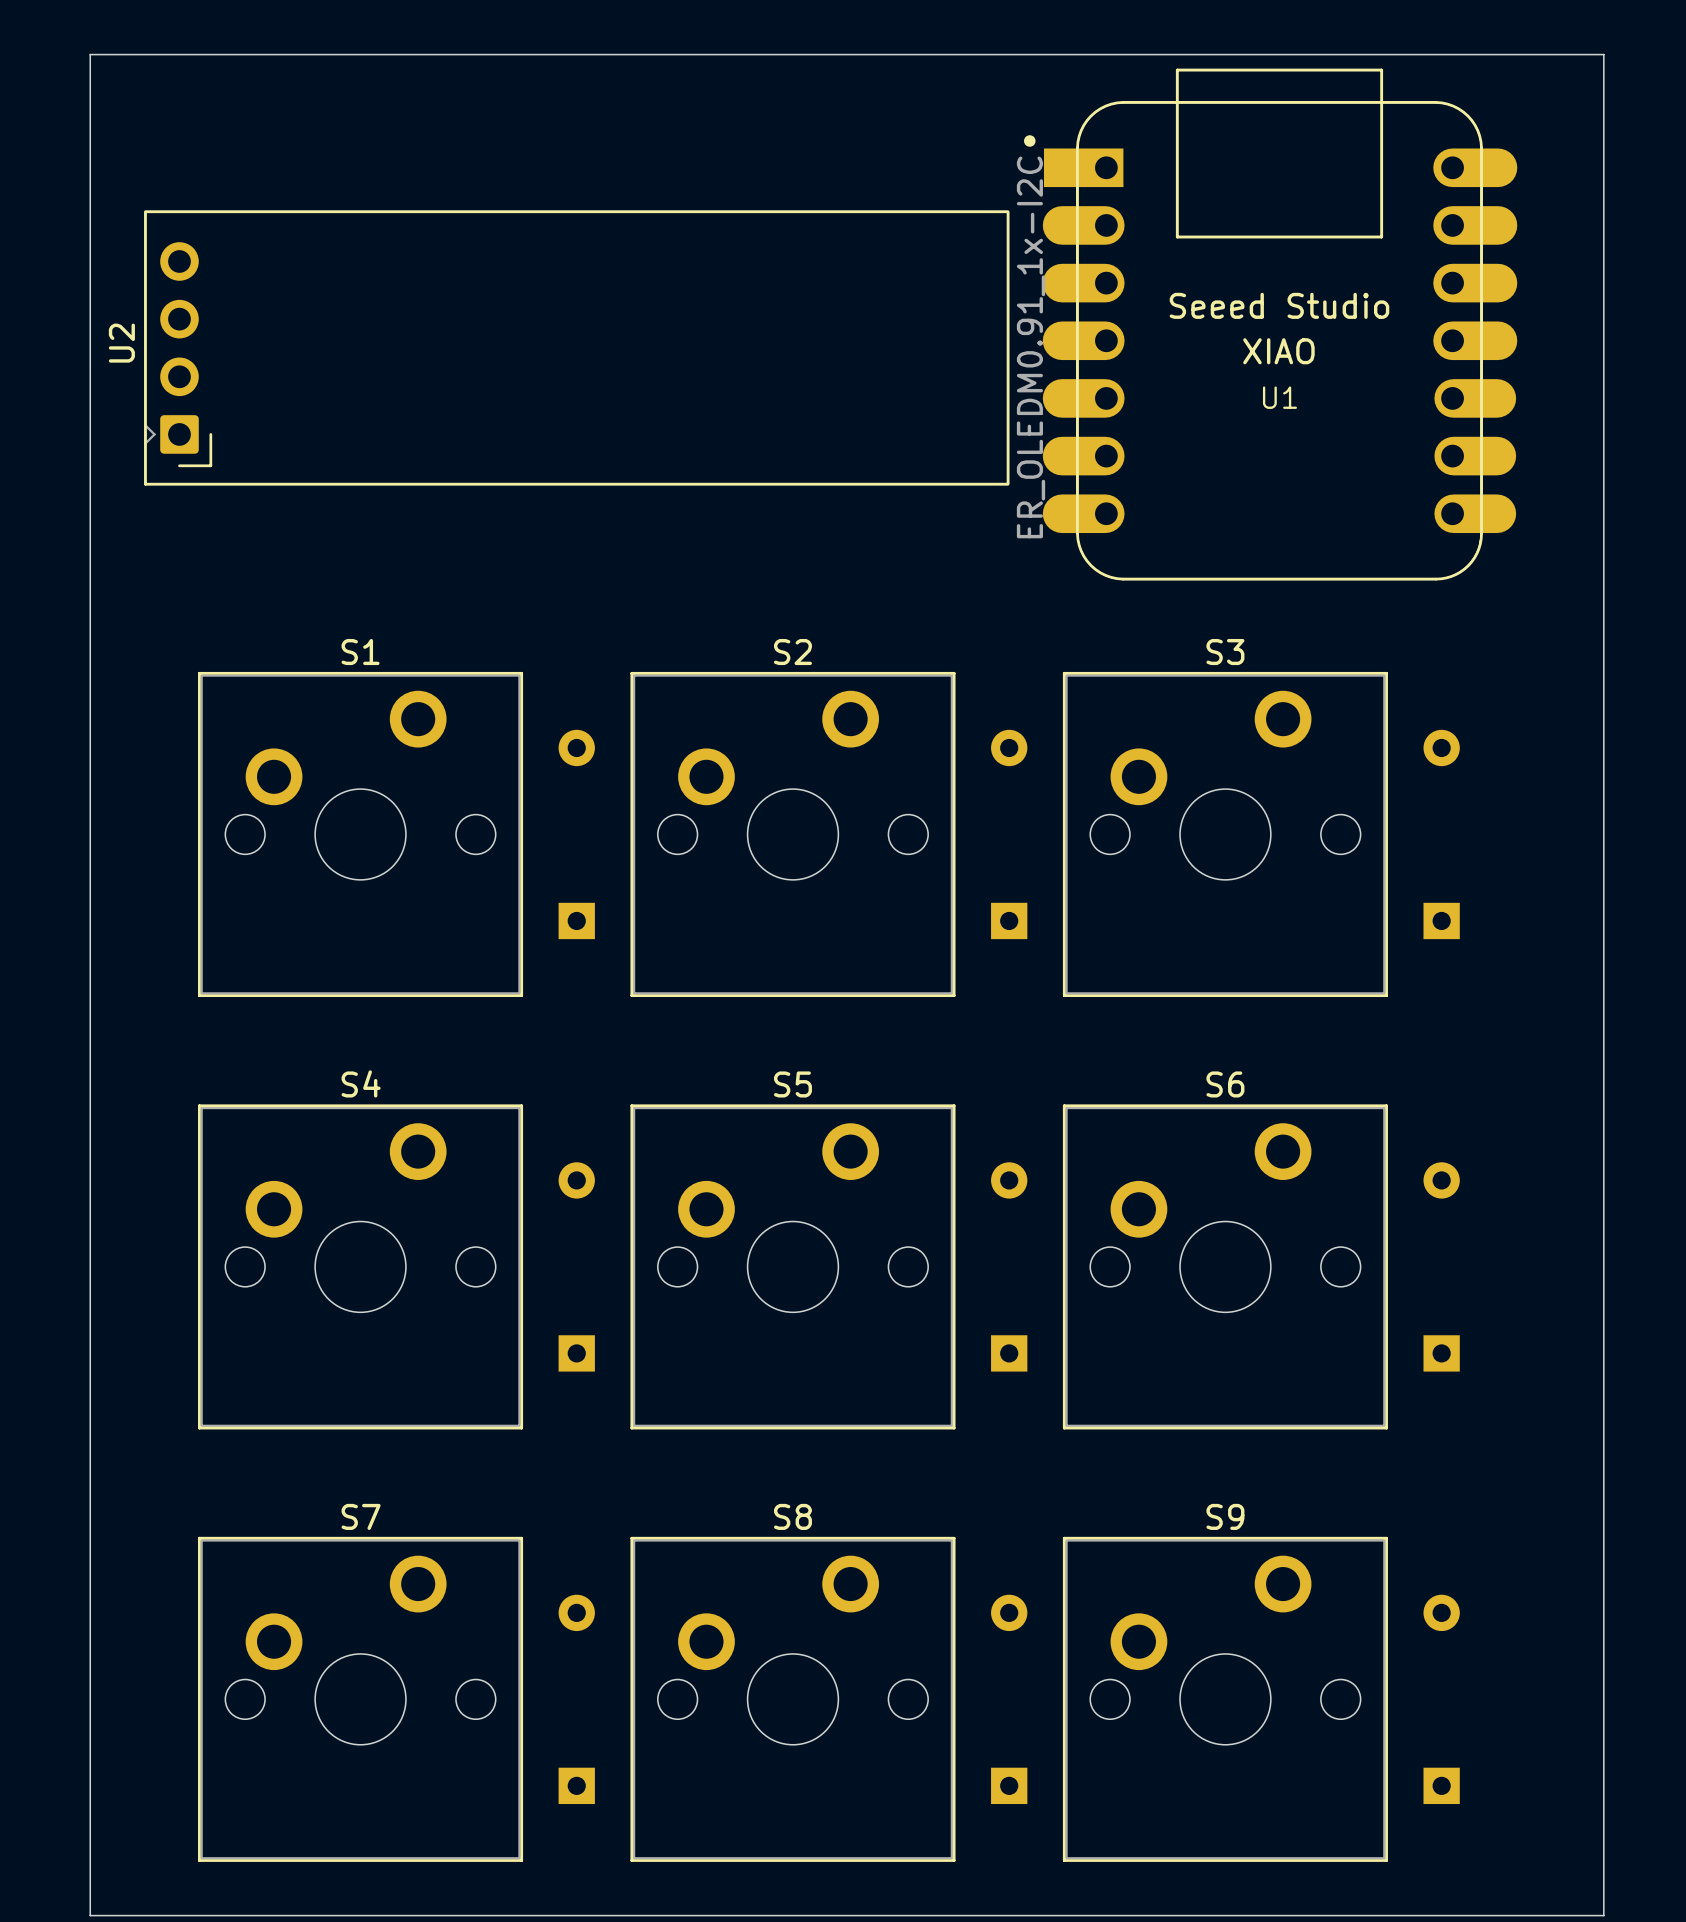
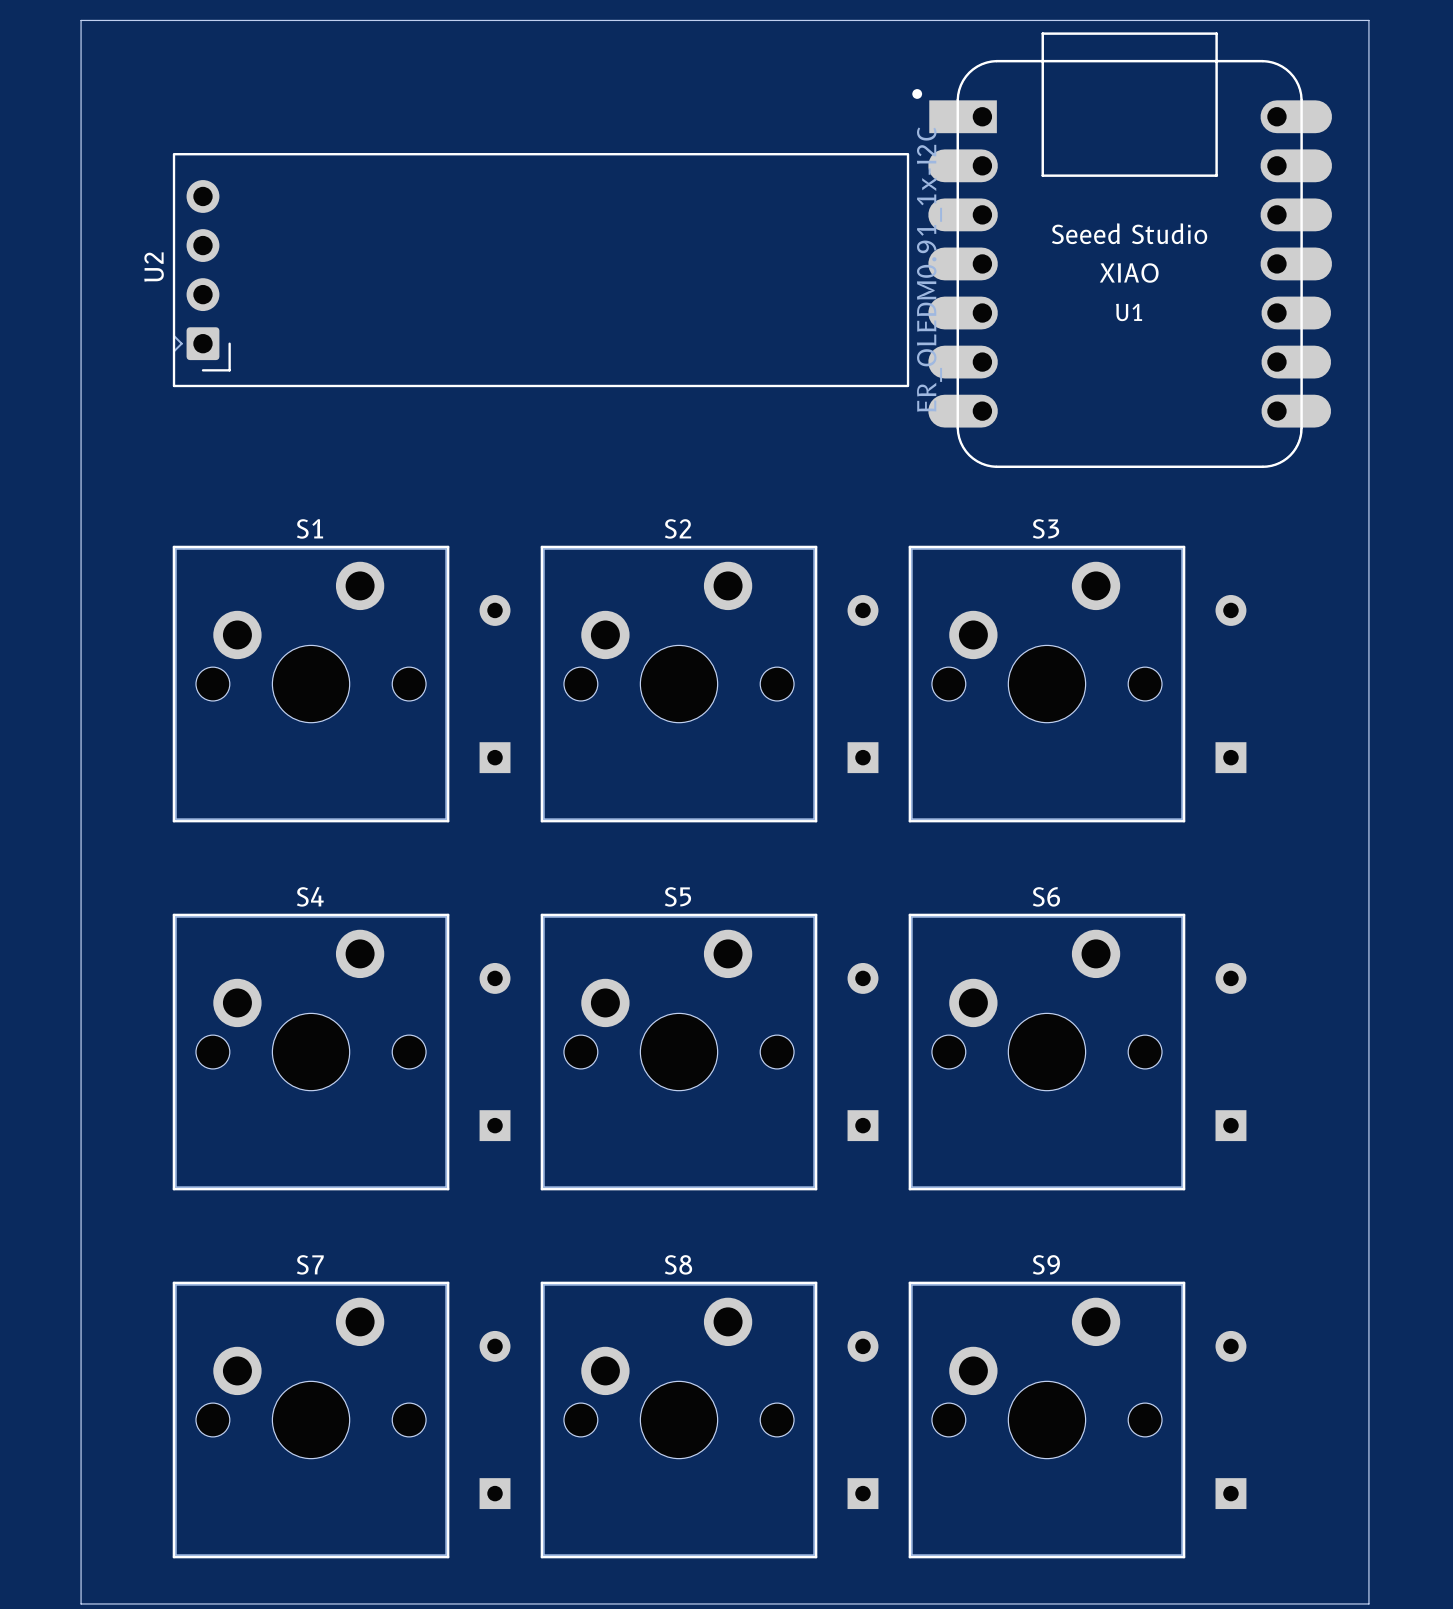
U1 position: (1270, 324) -> (1122, 250)
U2 position: (576, 347) -> (541, 270)

